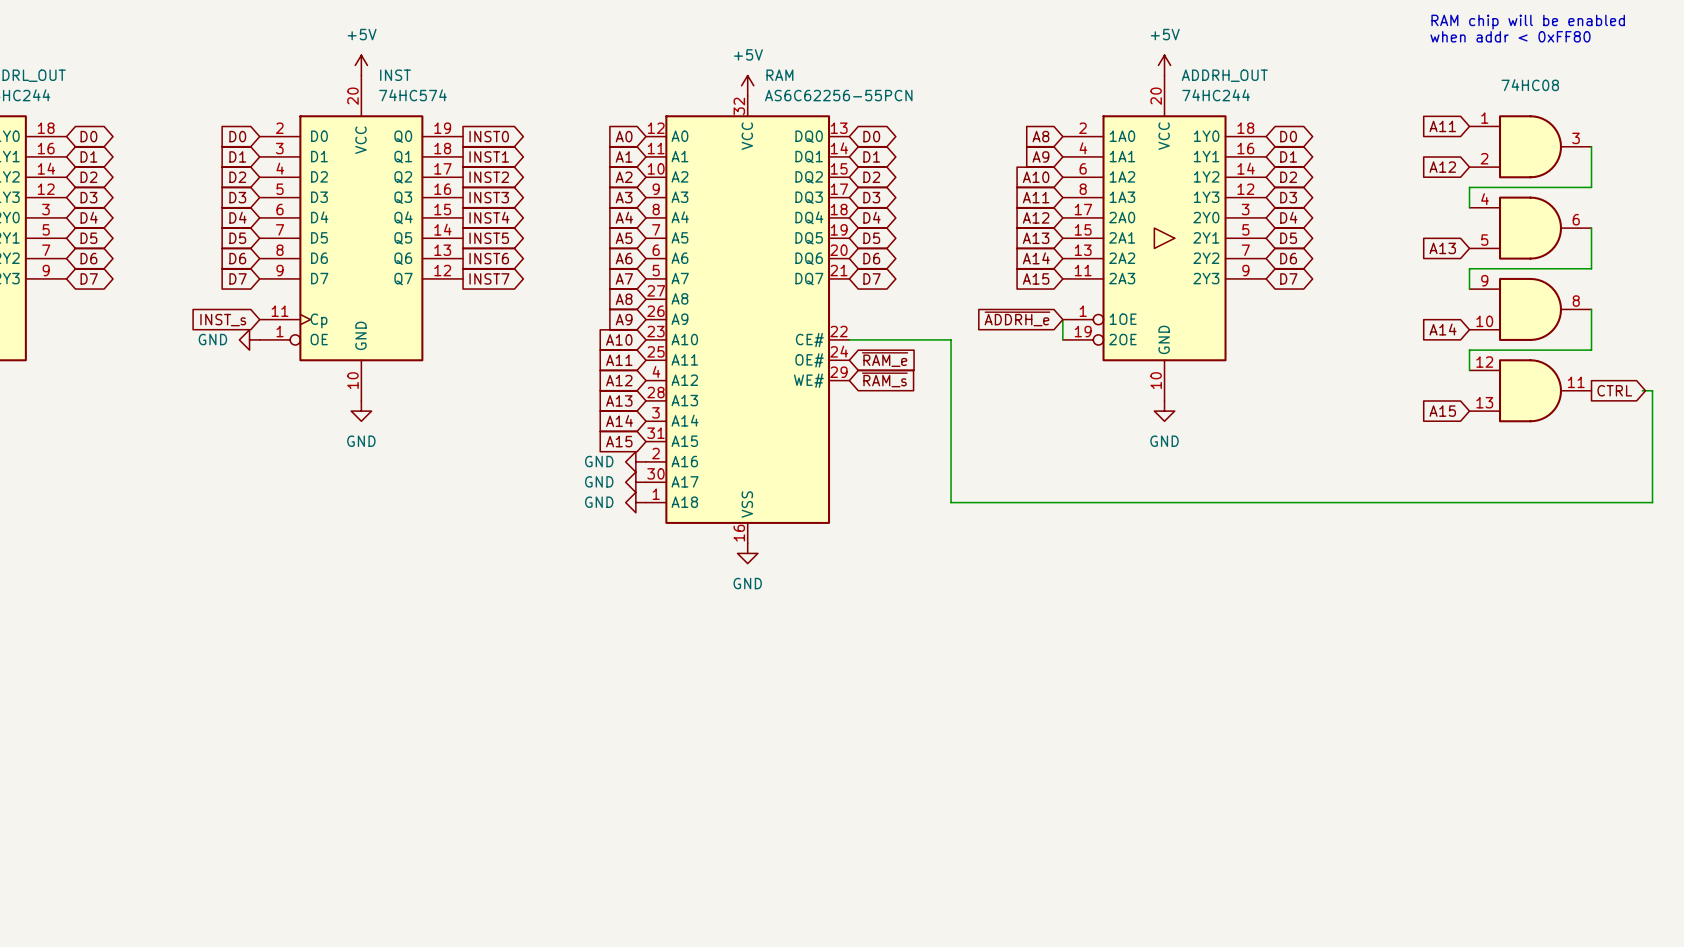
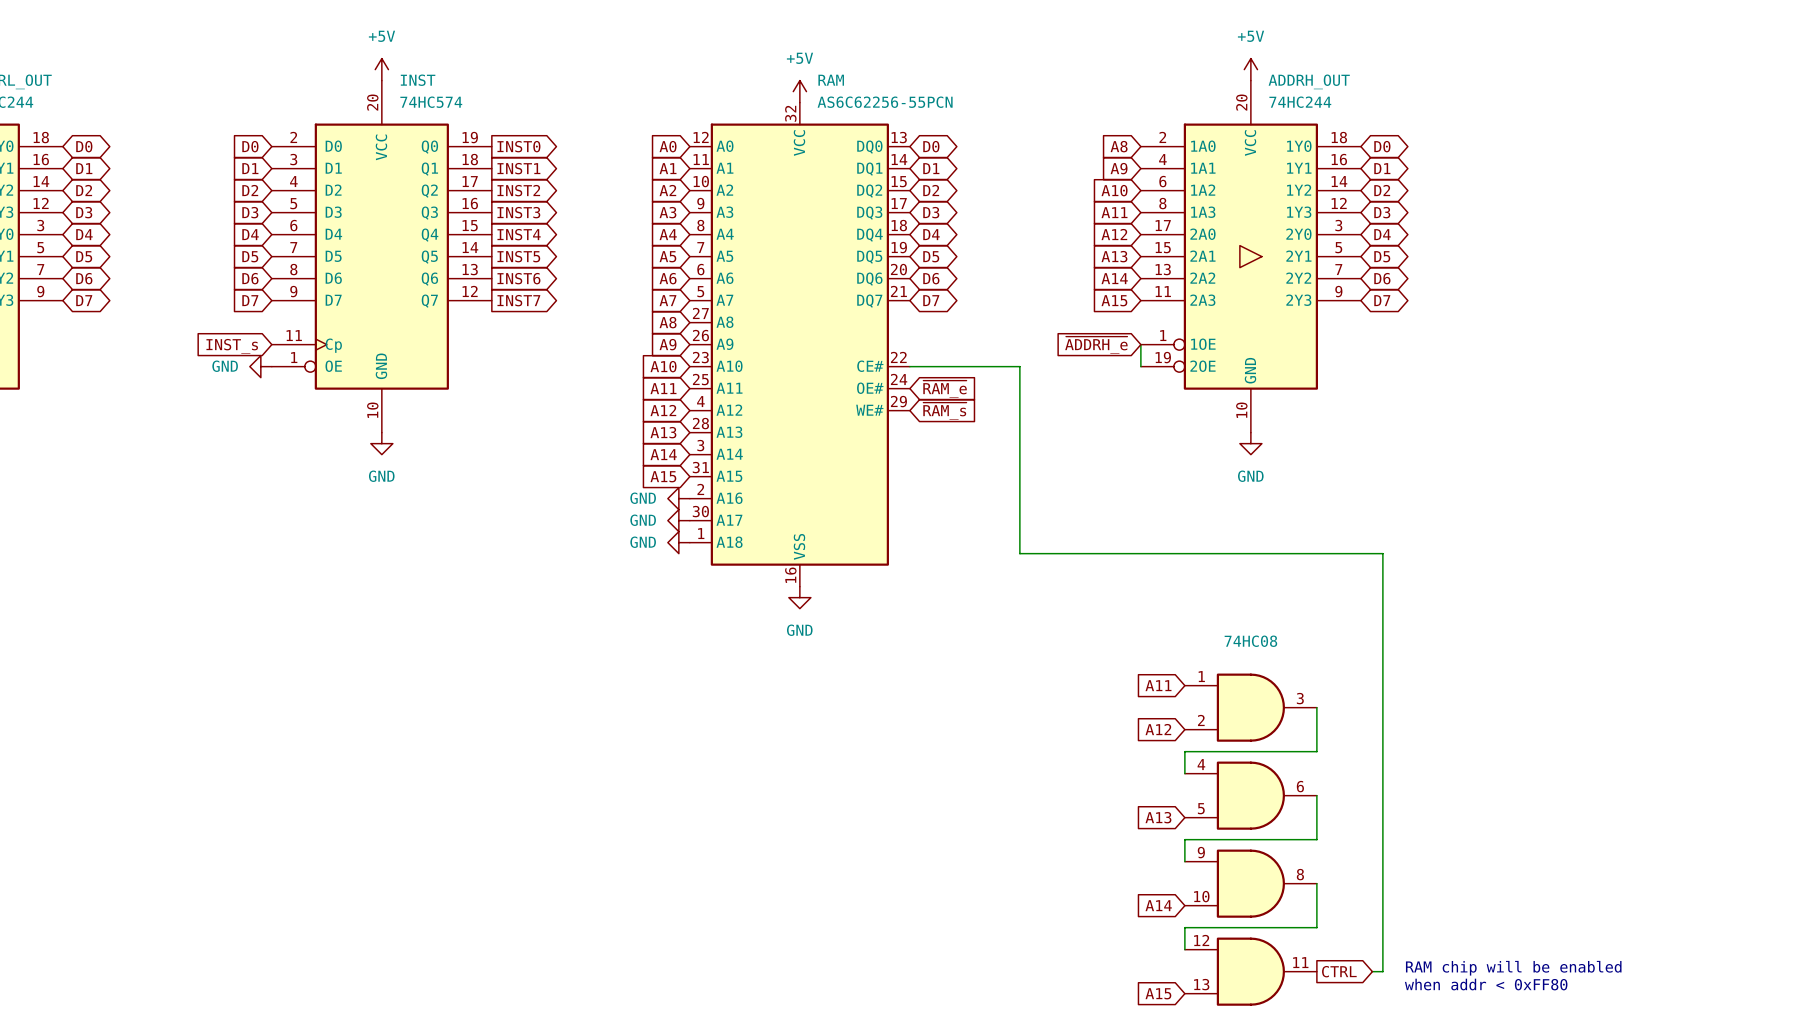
text: RAM chip will be enabled (1528, 22) -> none
text: when addr < 0xFF80 (1510, 36) -> none
global label: A11 (1442, 126) -> none
part: 74HC08 (1530, 146) -> none
wire: (1591, 146) (1591, 187) (1469, 187) (1469, 207) -> none
global label: A12 (1442, 167) -> none
part: (1530, 228) -> none
wire: (1591, 228) (1591, 268) (1469, 268) (1469, 289) -> none
global label: A13 (1442, 248) -> none
part: (1530, 309) -> none
wire: (1591, 309) (1591, 350) (1469, 350) (1469, 370) -> none
global label: A14 (1442, 329) -> none
part: (1530, 390) -> none
global label: CTRL (1614, 390) -> none
wire: (1642, 390) (1652, 390) (1652, 502) (951, 502) -> (1371, 971) (1382, 971) (1382, 553) (1019, 553) (1019, 542)
global label: A15 (1442, 411) -> none
global label: none -> A11 (1158, 685)
part: none -> 74HC08 (1250, 707)
wire: none -> (1316, 707) (1316, 751) (1184, 751) (1184, 773)
global label: none -> A12 (1158, 729)
part: none -> (1250, 795)
wire: none -> (1316, 795) (1316, 839) (1184, 839) (1184, 861)
global label: none -> A13 (1158, 817)
part: none -> (1250, 883)
wire: none -> (1316, 883) (1316, 927) (1184, 927) (1184, 949)
global label: none -> A14 (1158, 905)
text: none -> RAM chip will be enabled (1513, 968)
part: none -> (1250, 971)
global label: none -> CTRL (1339, 971)
text: none -> when addr < 0xFF80 (1486, 984)
global label: none -> A15 (1158, 993)

